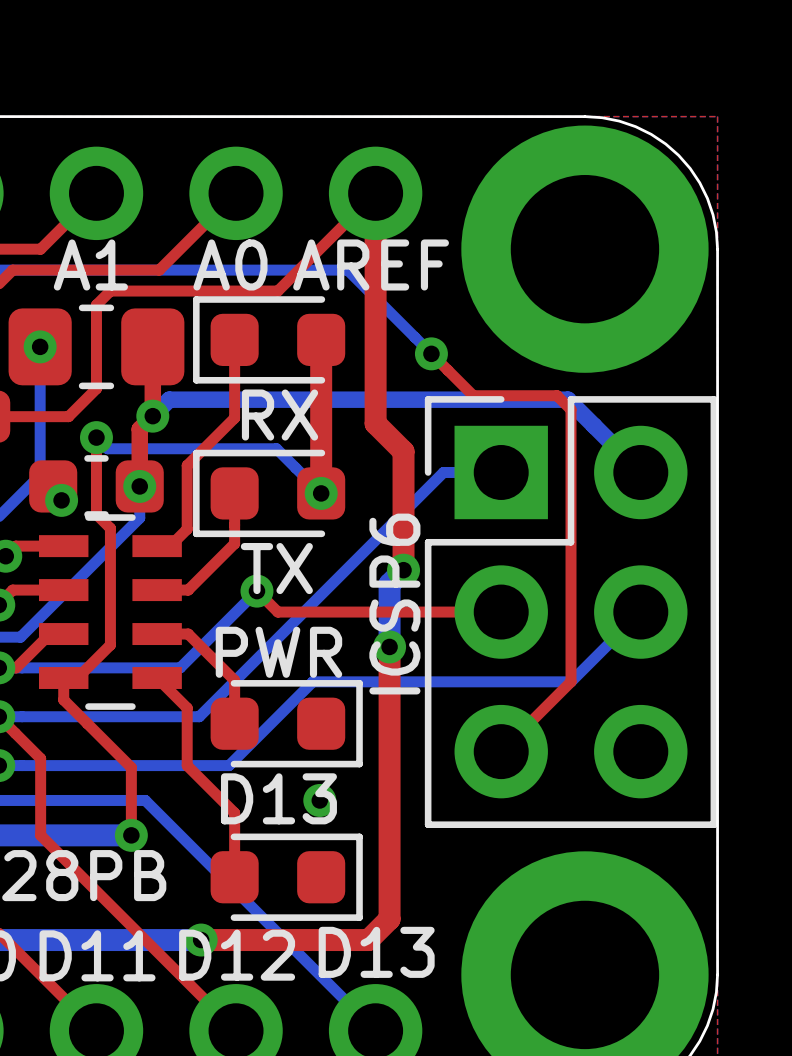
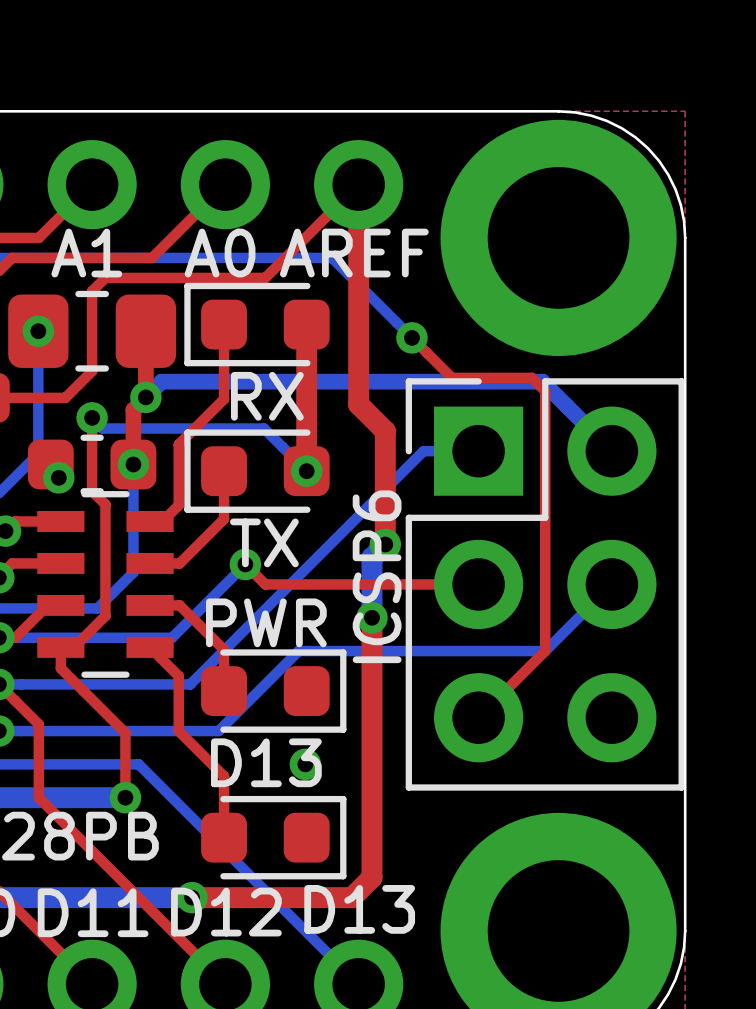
bottom track: (139, 518) (20, 637) -> (133, 494) (133, 572) (97, 608) (19, 608)

